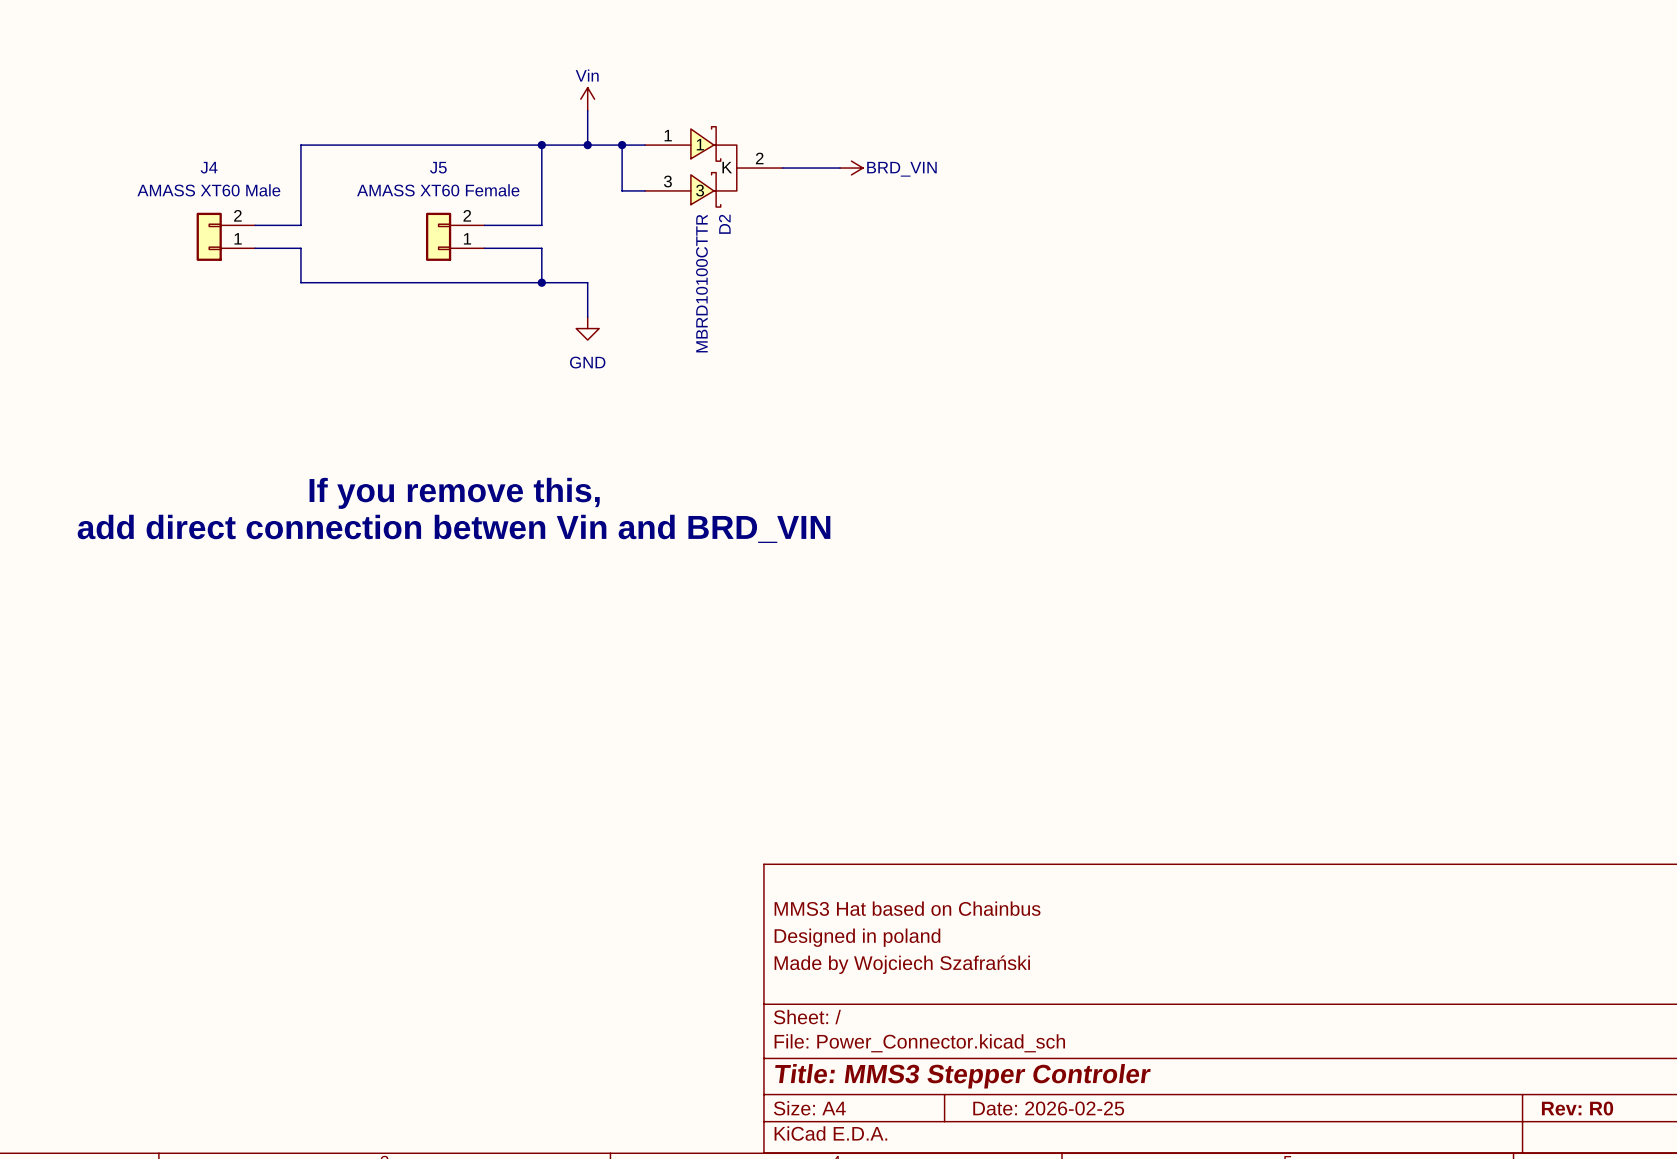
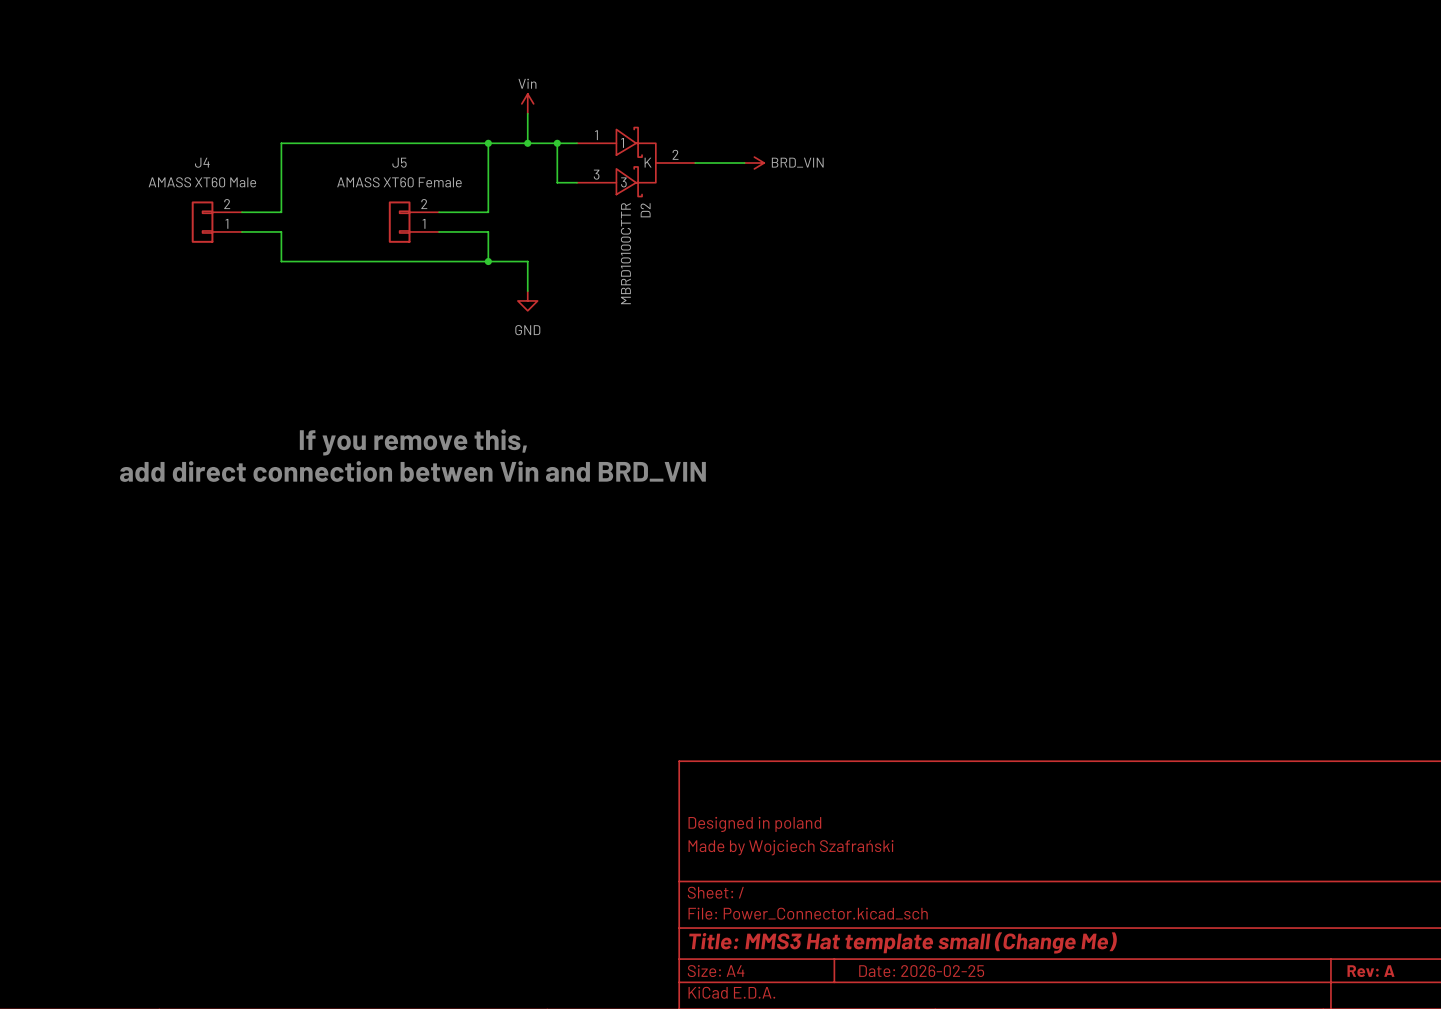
title block: MMS3 Hat based on Chainbus (907, 908) -> none
title block: Title: MMS3 Stepper Controler (962, 1076) -> Title: MMS3 Hat template small (Change Me) (903, 942)
title block: Rev: R0 (1577, 1108) -> Rev: A (1370, 971)

